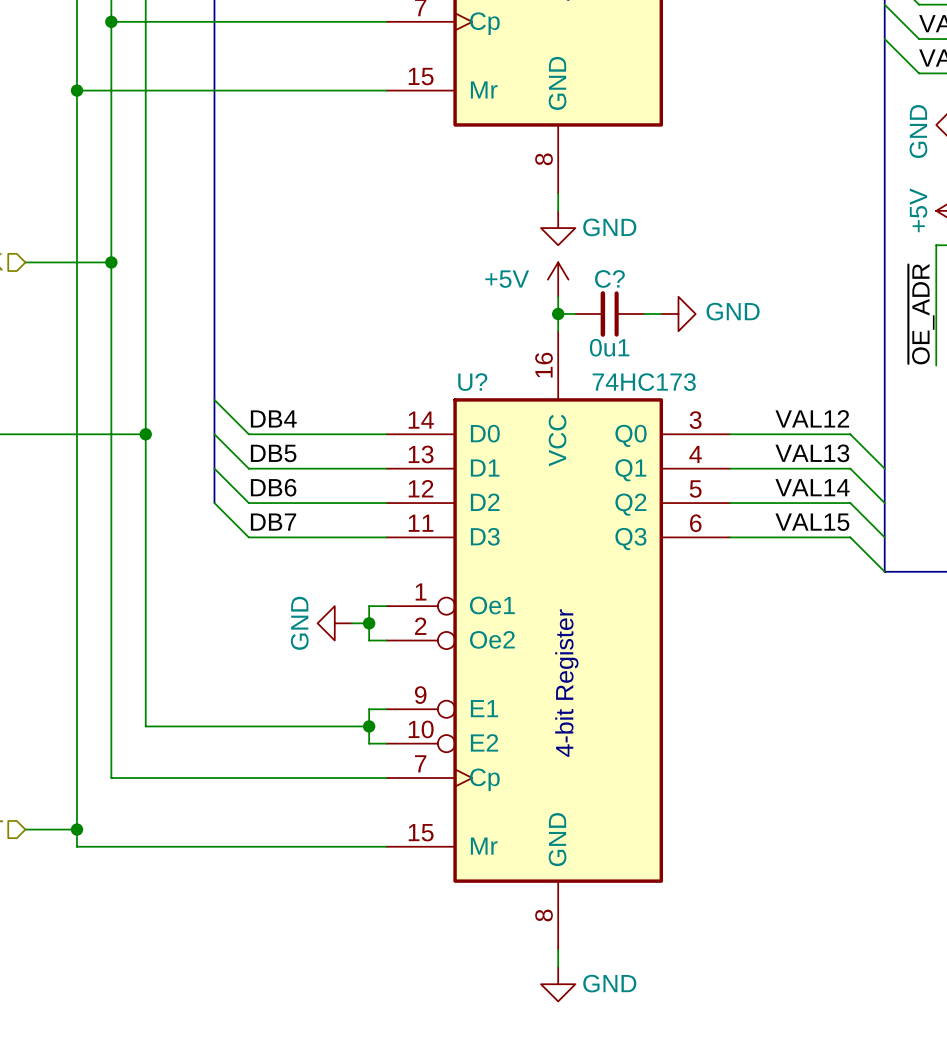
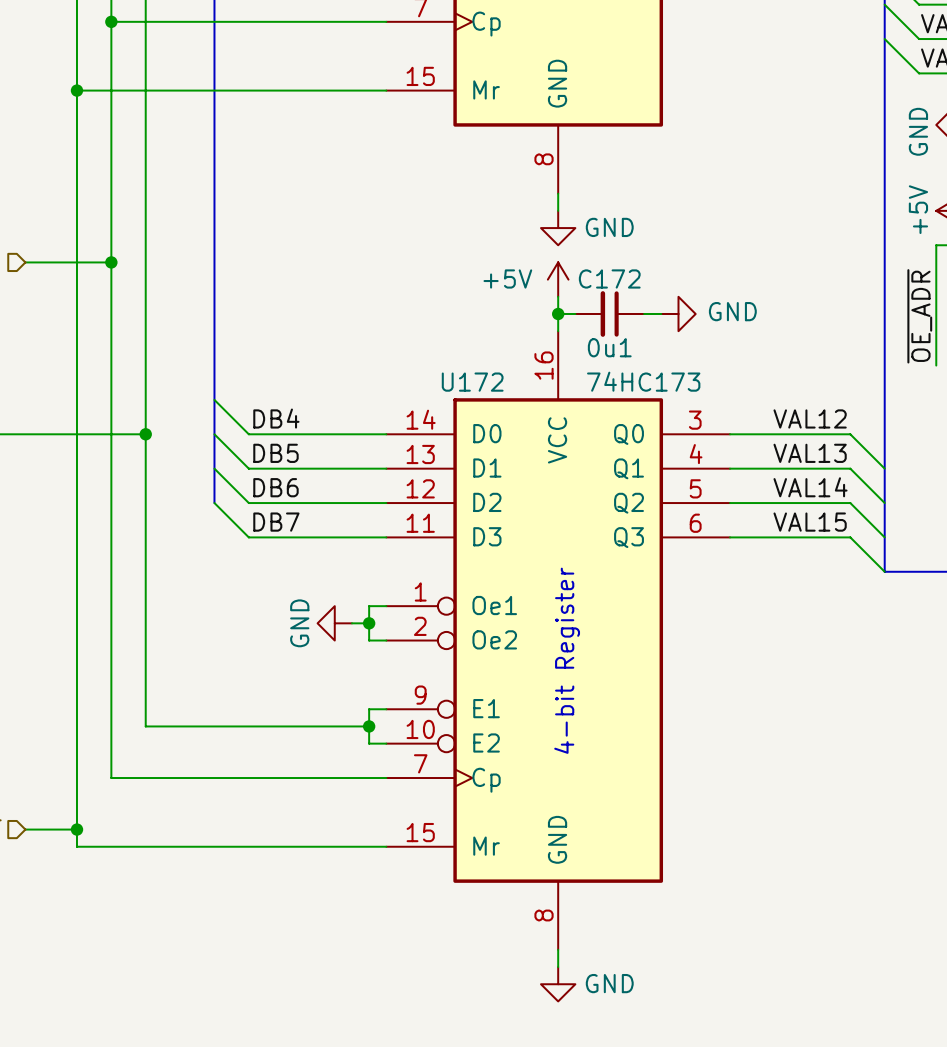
C? name: C? (609, 278) -> C172 (609, 278)
U? name: U? (472, 382) -> U172 (472, 382)

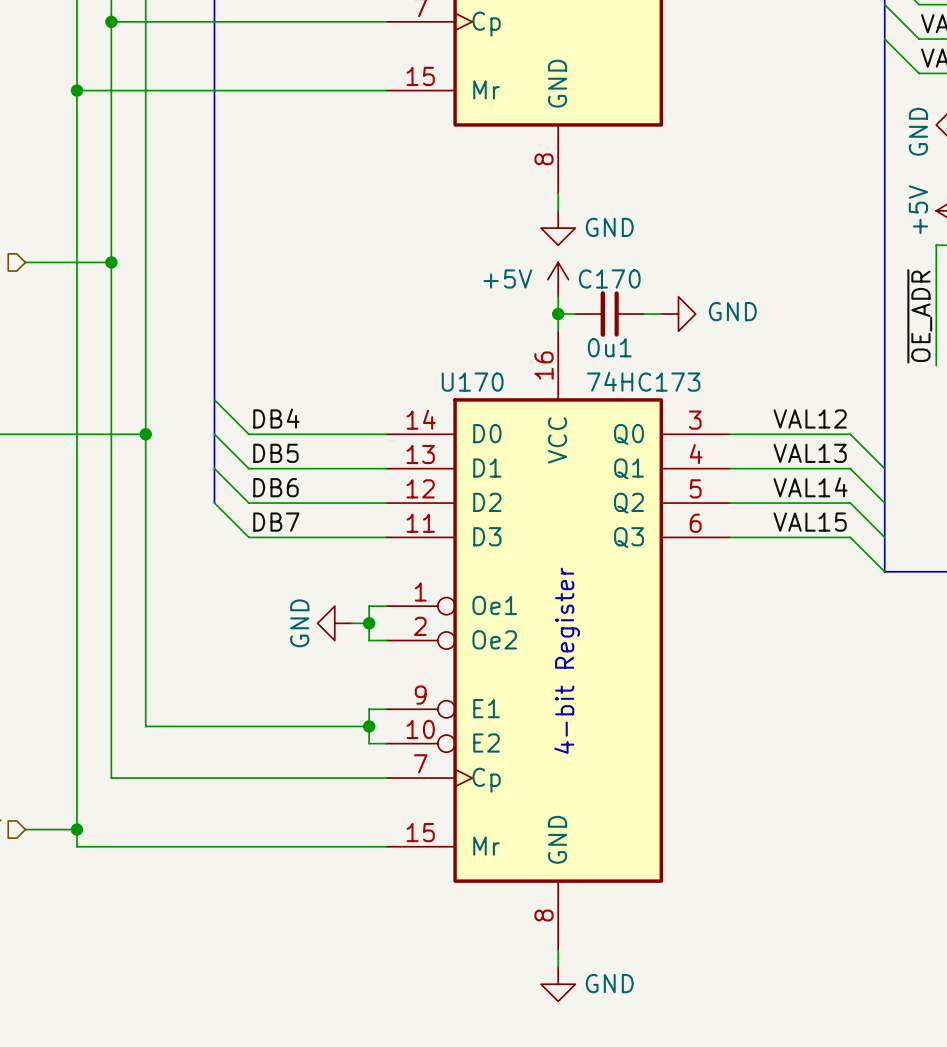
C172 name: C172 (609, 278) -> C170 (609, 278)
U172 name: U172 (472, 382) -> U170 (472, 382)

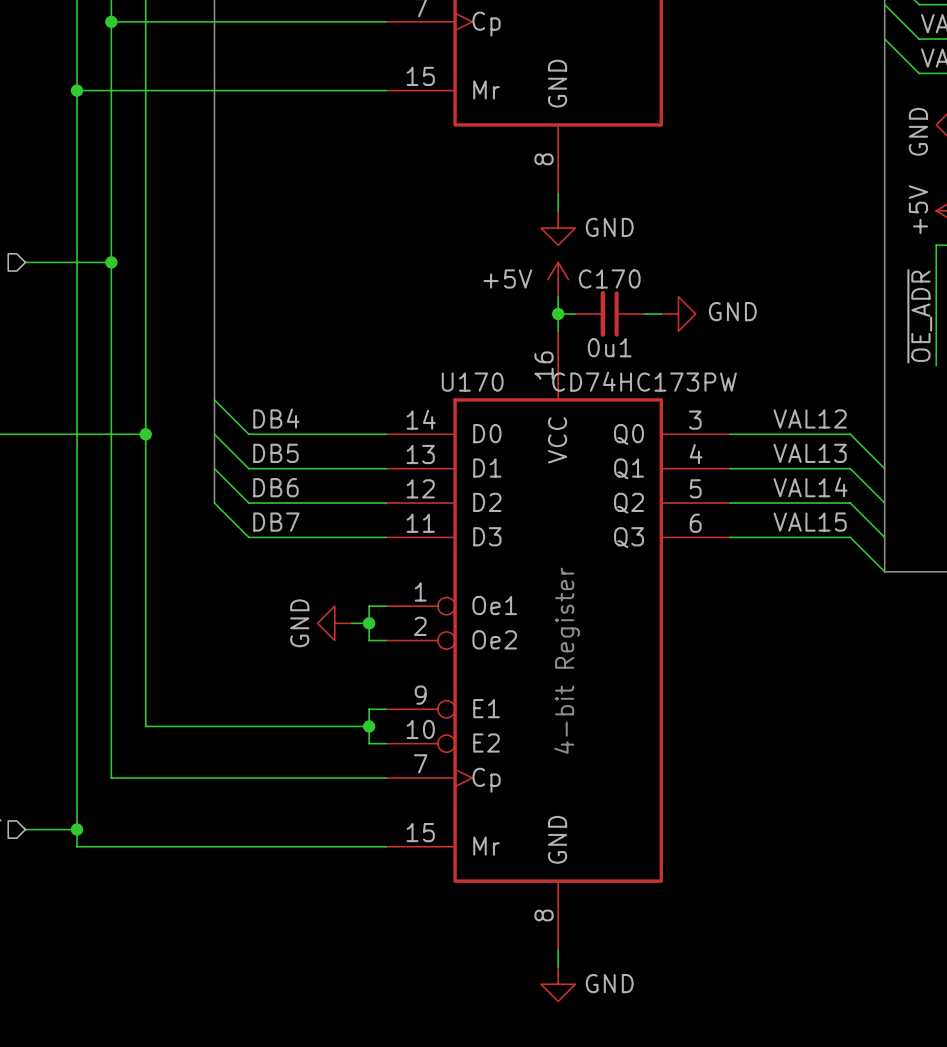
U170 value: 74HC173 (643, 381) -> CD74HC173PW (644, 381)

